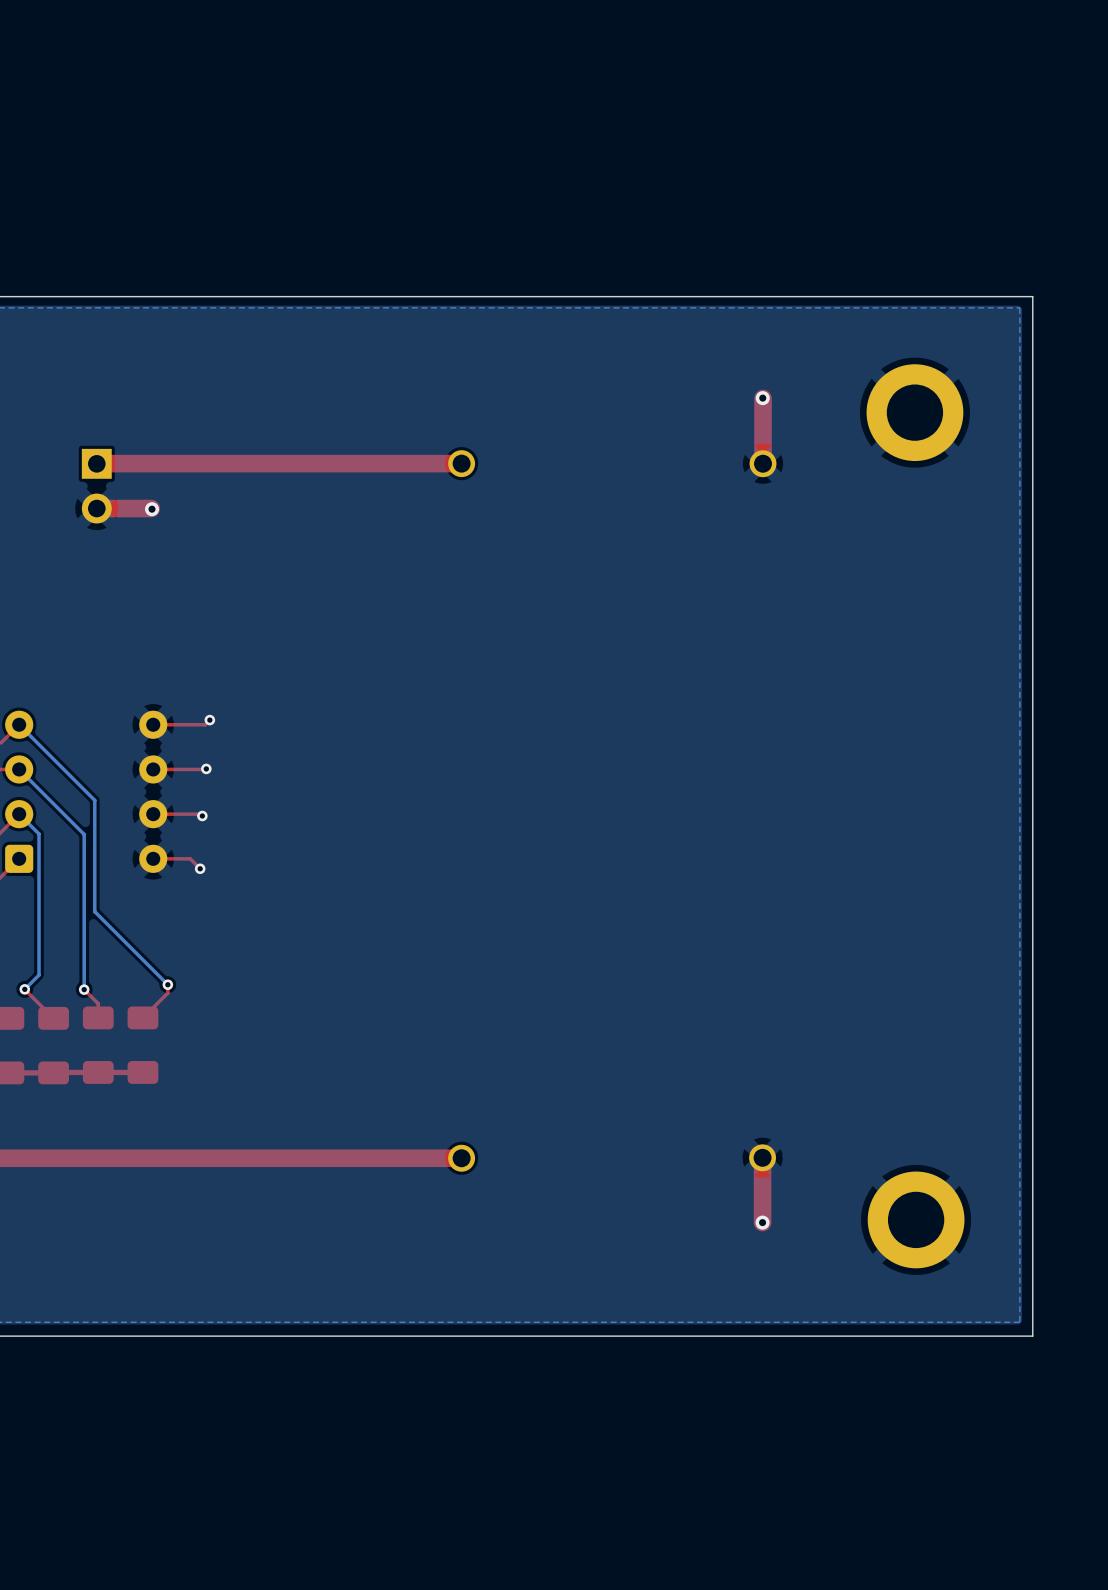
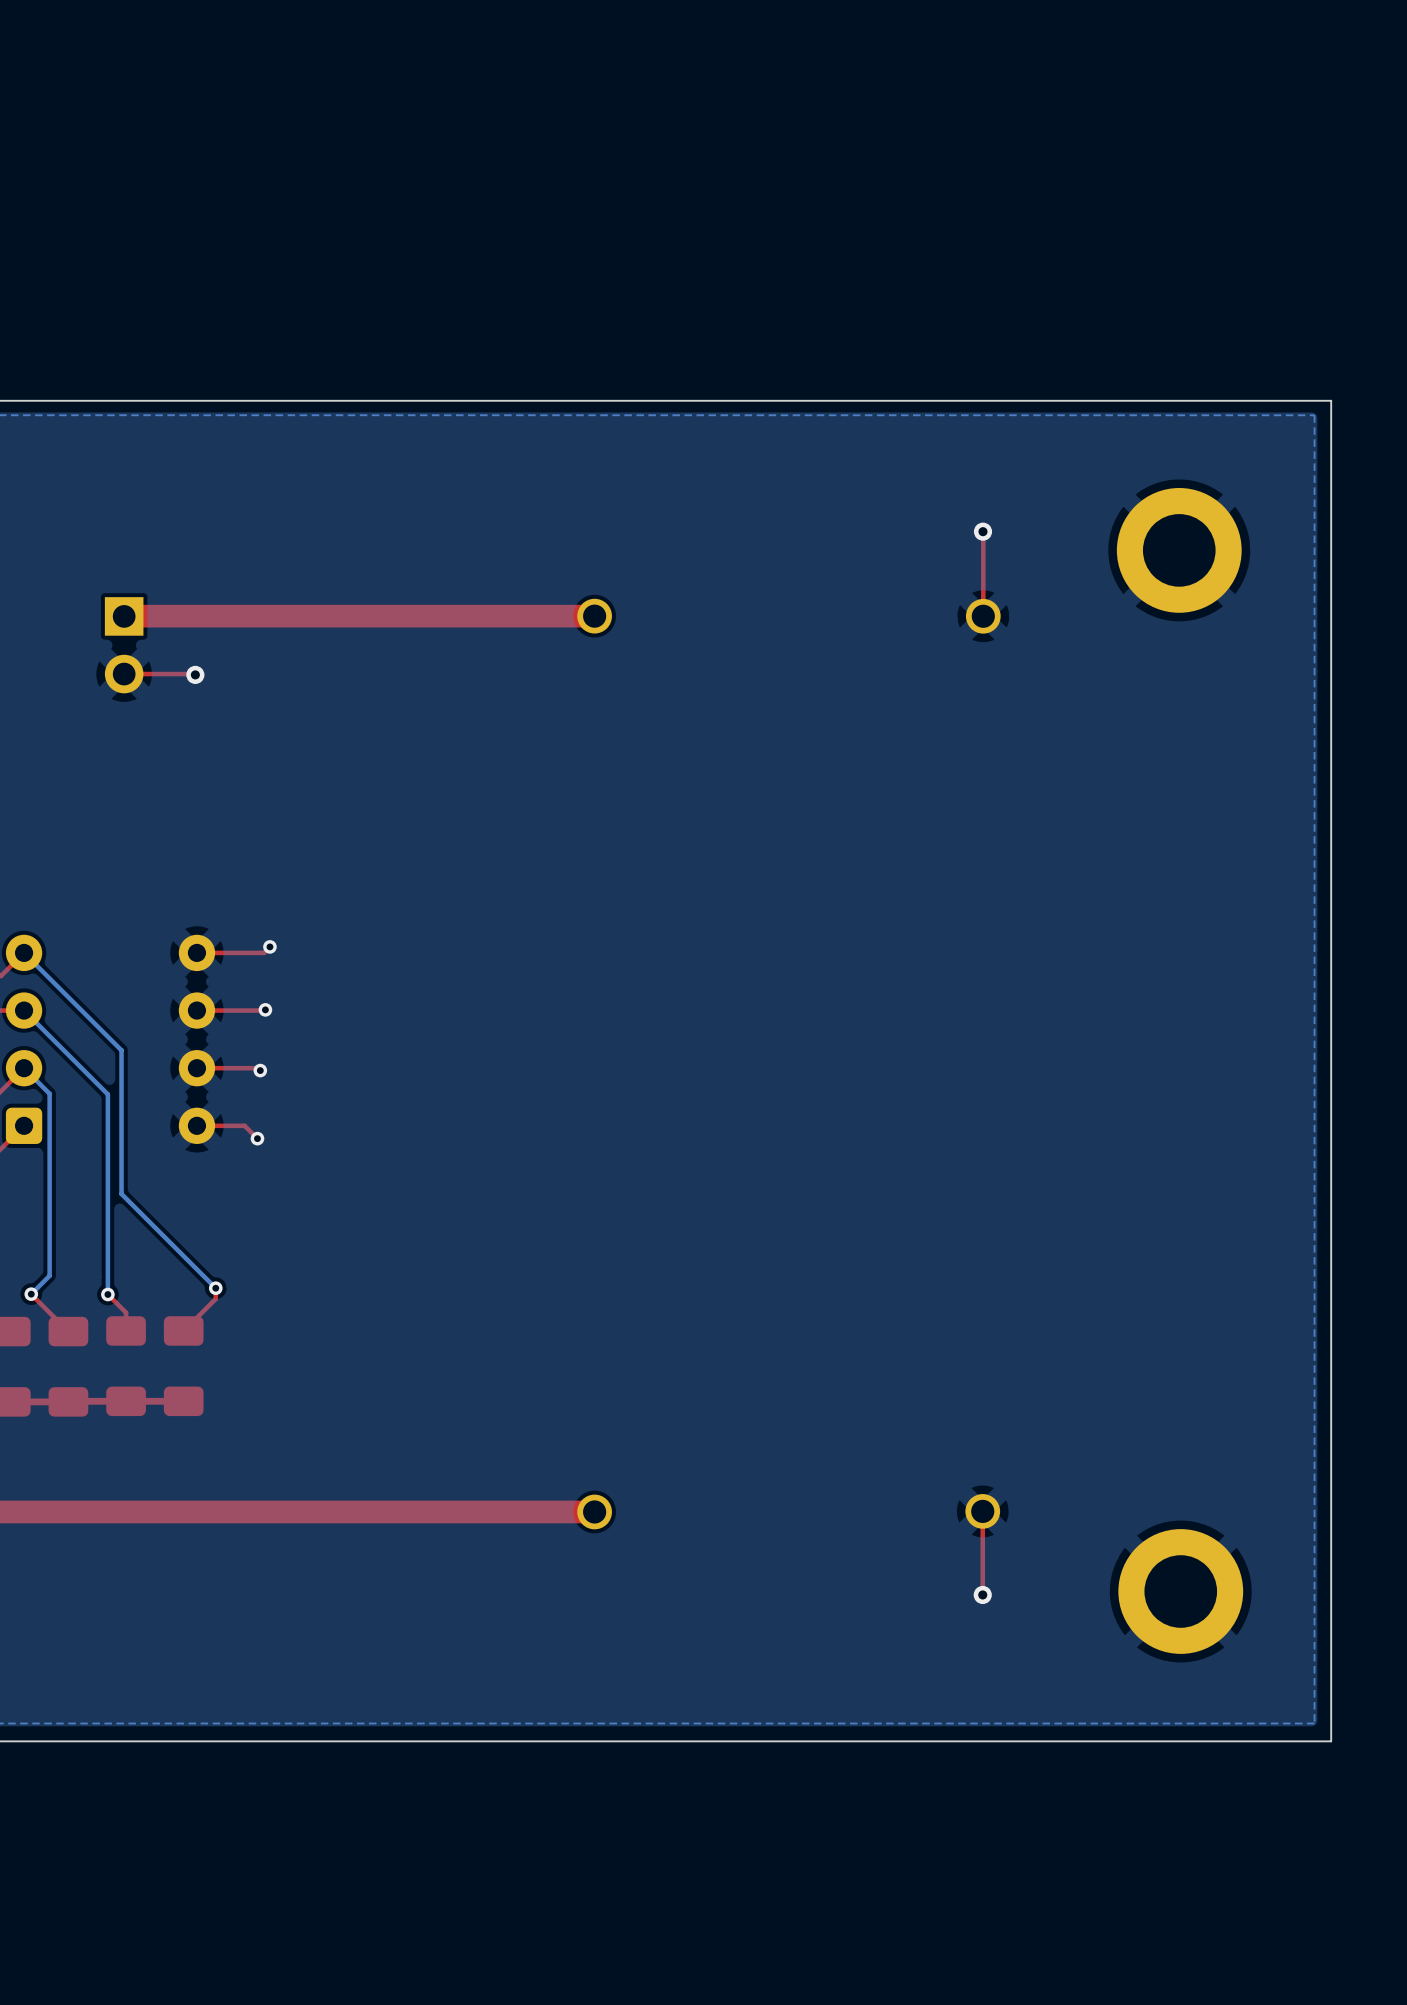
top track width: thick (763, 398) (763, 463) -> thin (983, 531) (983, 616)
top track width: thick (151, 508) (96, 508) -> thin (194, 674) (124, 674)
top track width: thick (762, 1157) (762, 1222) -> thin (982, 1511) (982, 1594)

